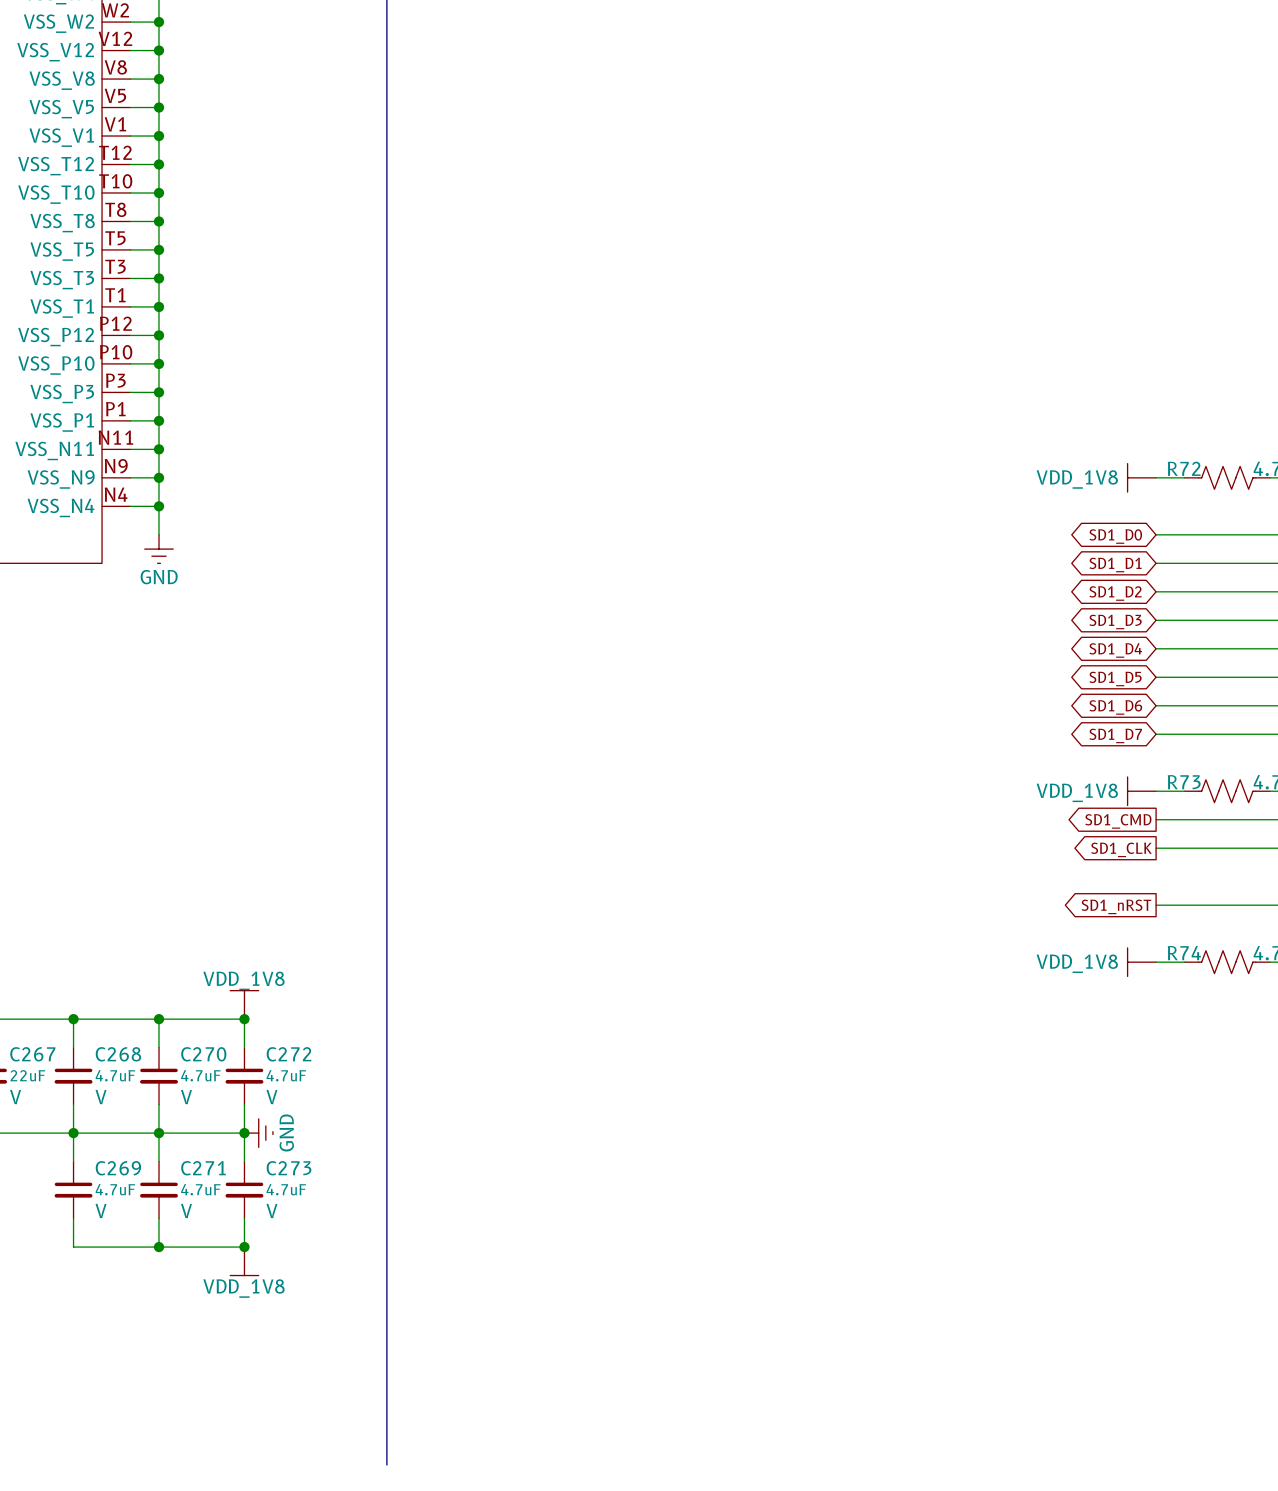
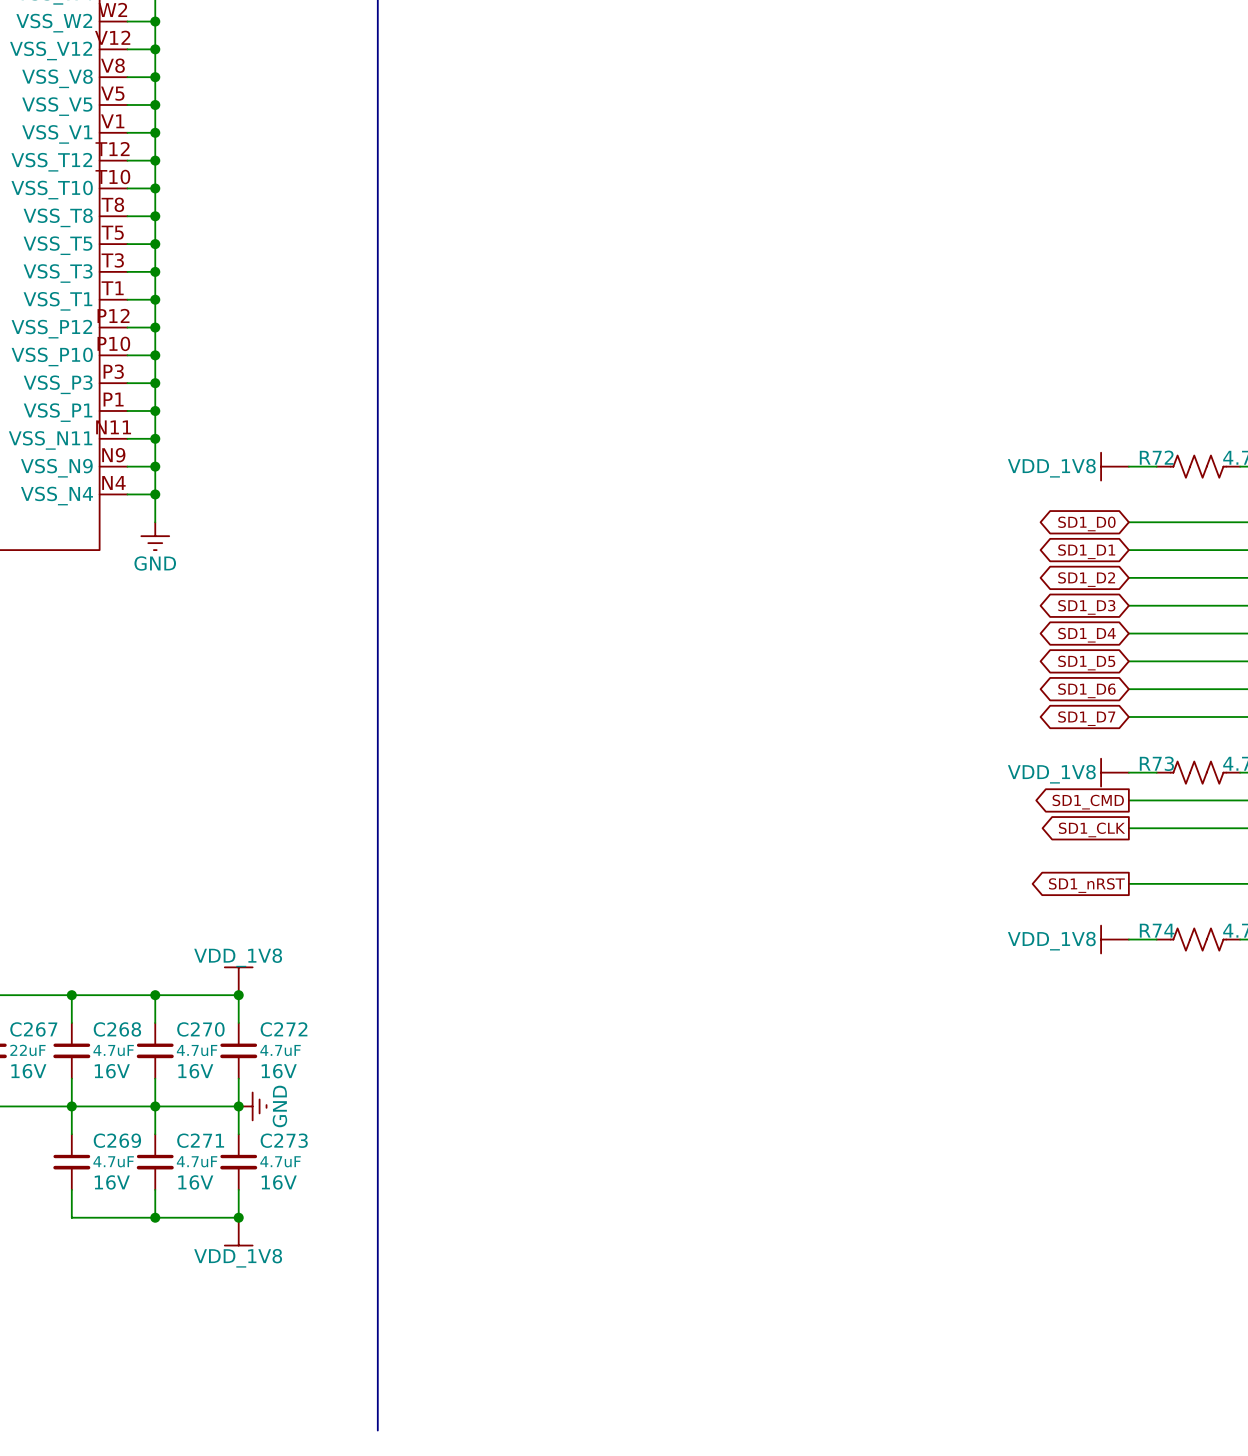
C267 text: V (15, 1097) -> 16V (28, 1071)
C268 text: V (101, 1097) -> 16V (112, 1071)
C270 text: V (186, 1097) -> 16V (195, 1071)
C272 text: V (271, 1097) -> 16V (279, 1071)
C269 text: V (101, 1210) -> 16V (112, 1182)
C271 text: V (186, 1210) -> 16V (195, 1182)
C273 text: V (271, 1210) -> 16V (279, 1182)

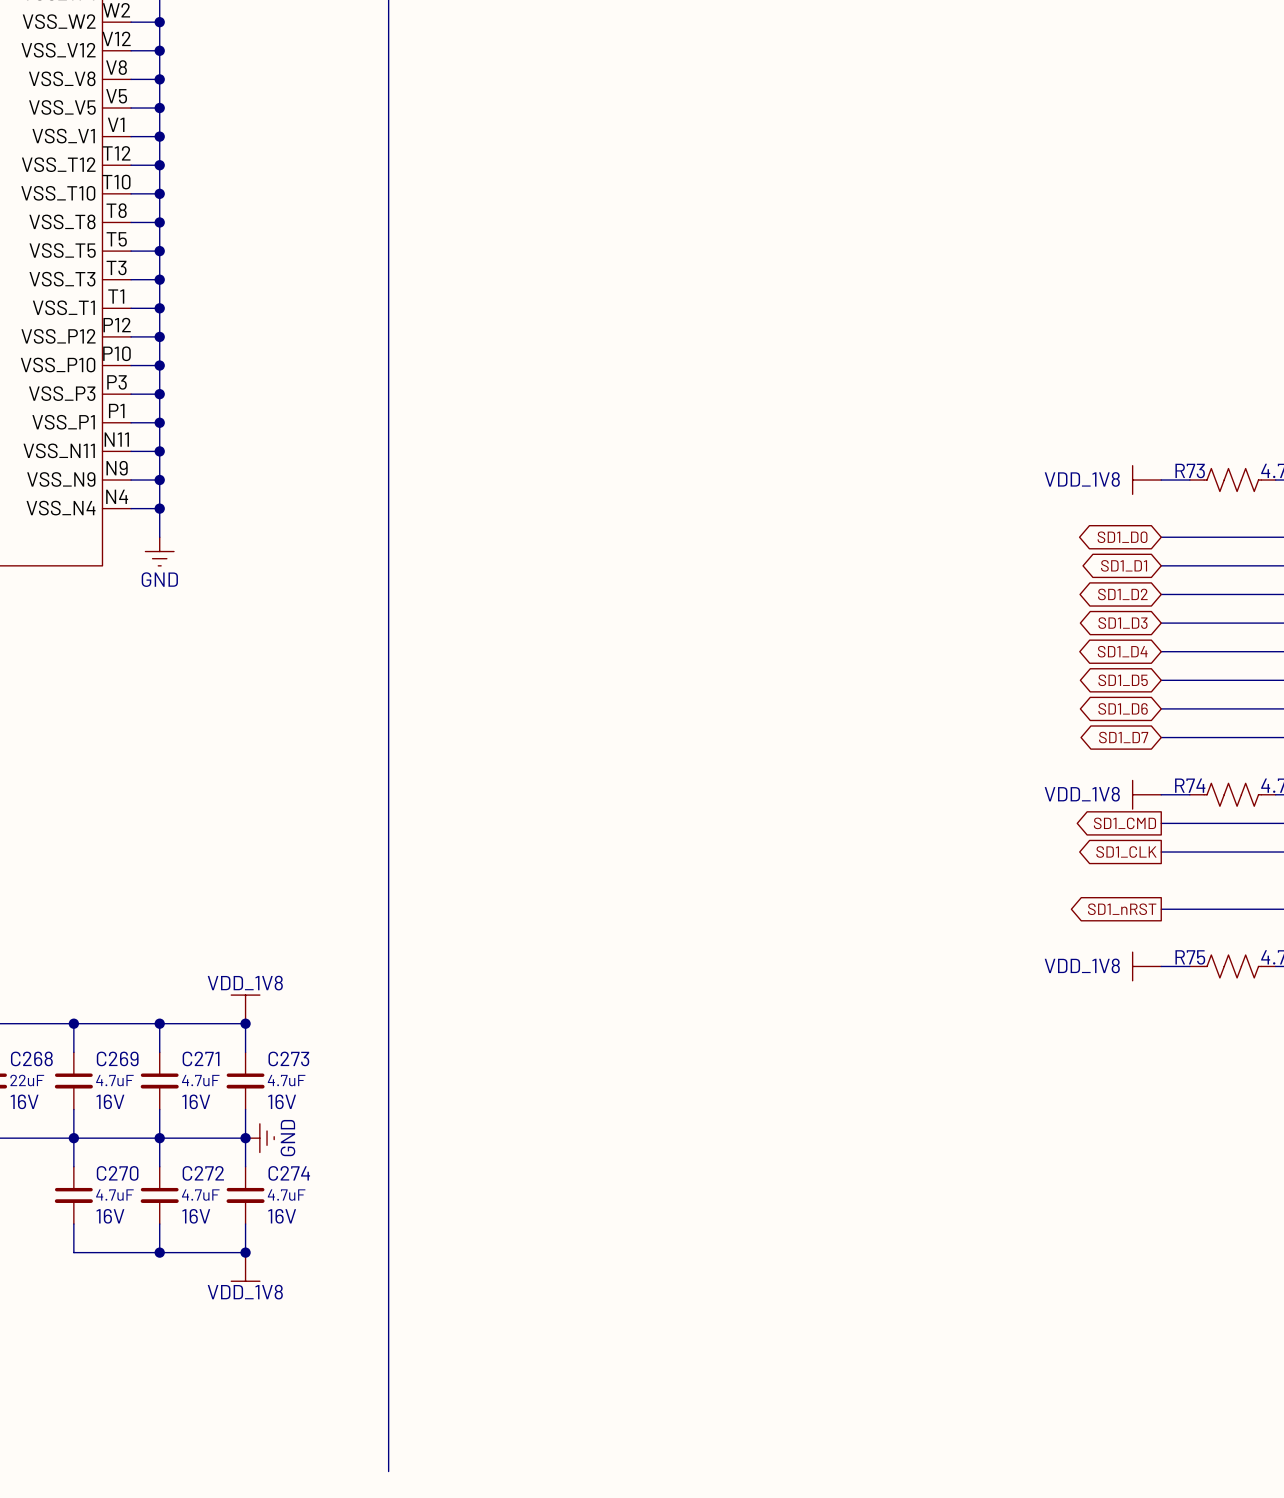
R72 name: R72 (1156, 457) -> R73 (1190, 470)
R73 name: R73 (1156, 763) -> R74 (1190, 785)
R74 name: R74 (1157, 930) -> R75 (1190, 957)
C267 name: C267 (33, 1029) -> C268 (31, 1058)
C268 name: C268 (117, 1029) -> C269 (117, 1058)
C270 name: C270 (200, 1029) -> C271 (201, 1058)
C272 name: C272 (284, 1029) -> C273 (288, 1058)
C269 name: C269 (117, 1140) -> C270 (117, 1173)
C271 name: C271 (200, 1140) -> C272 (203, 1173)
C273 name: C273 (284, 1140) -> C274 (289, 1173)

